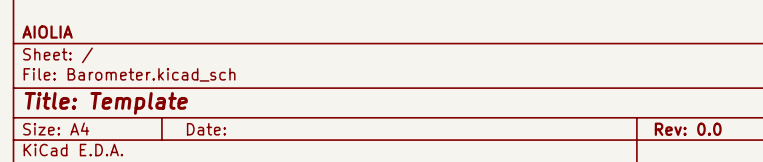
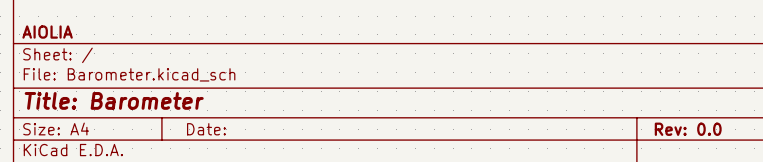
title block: Title: Template (106, 103) -> Title: Barometer (114, 100)

